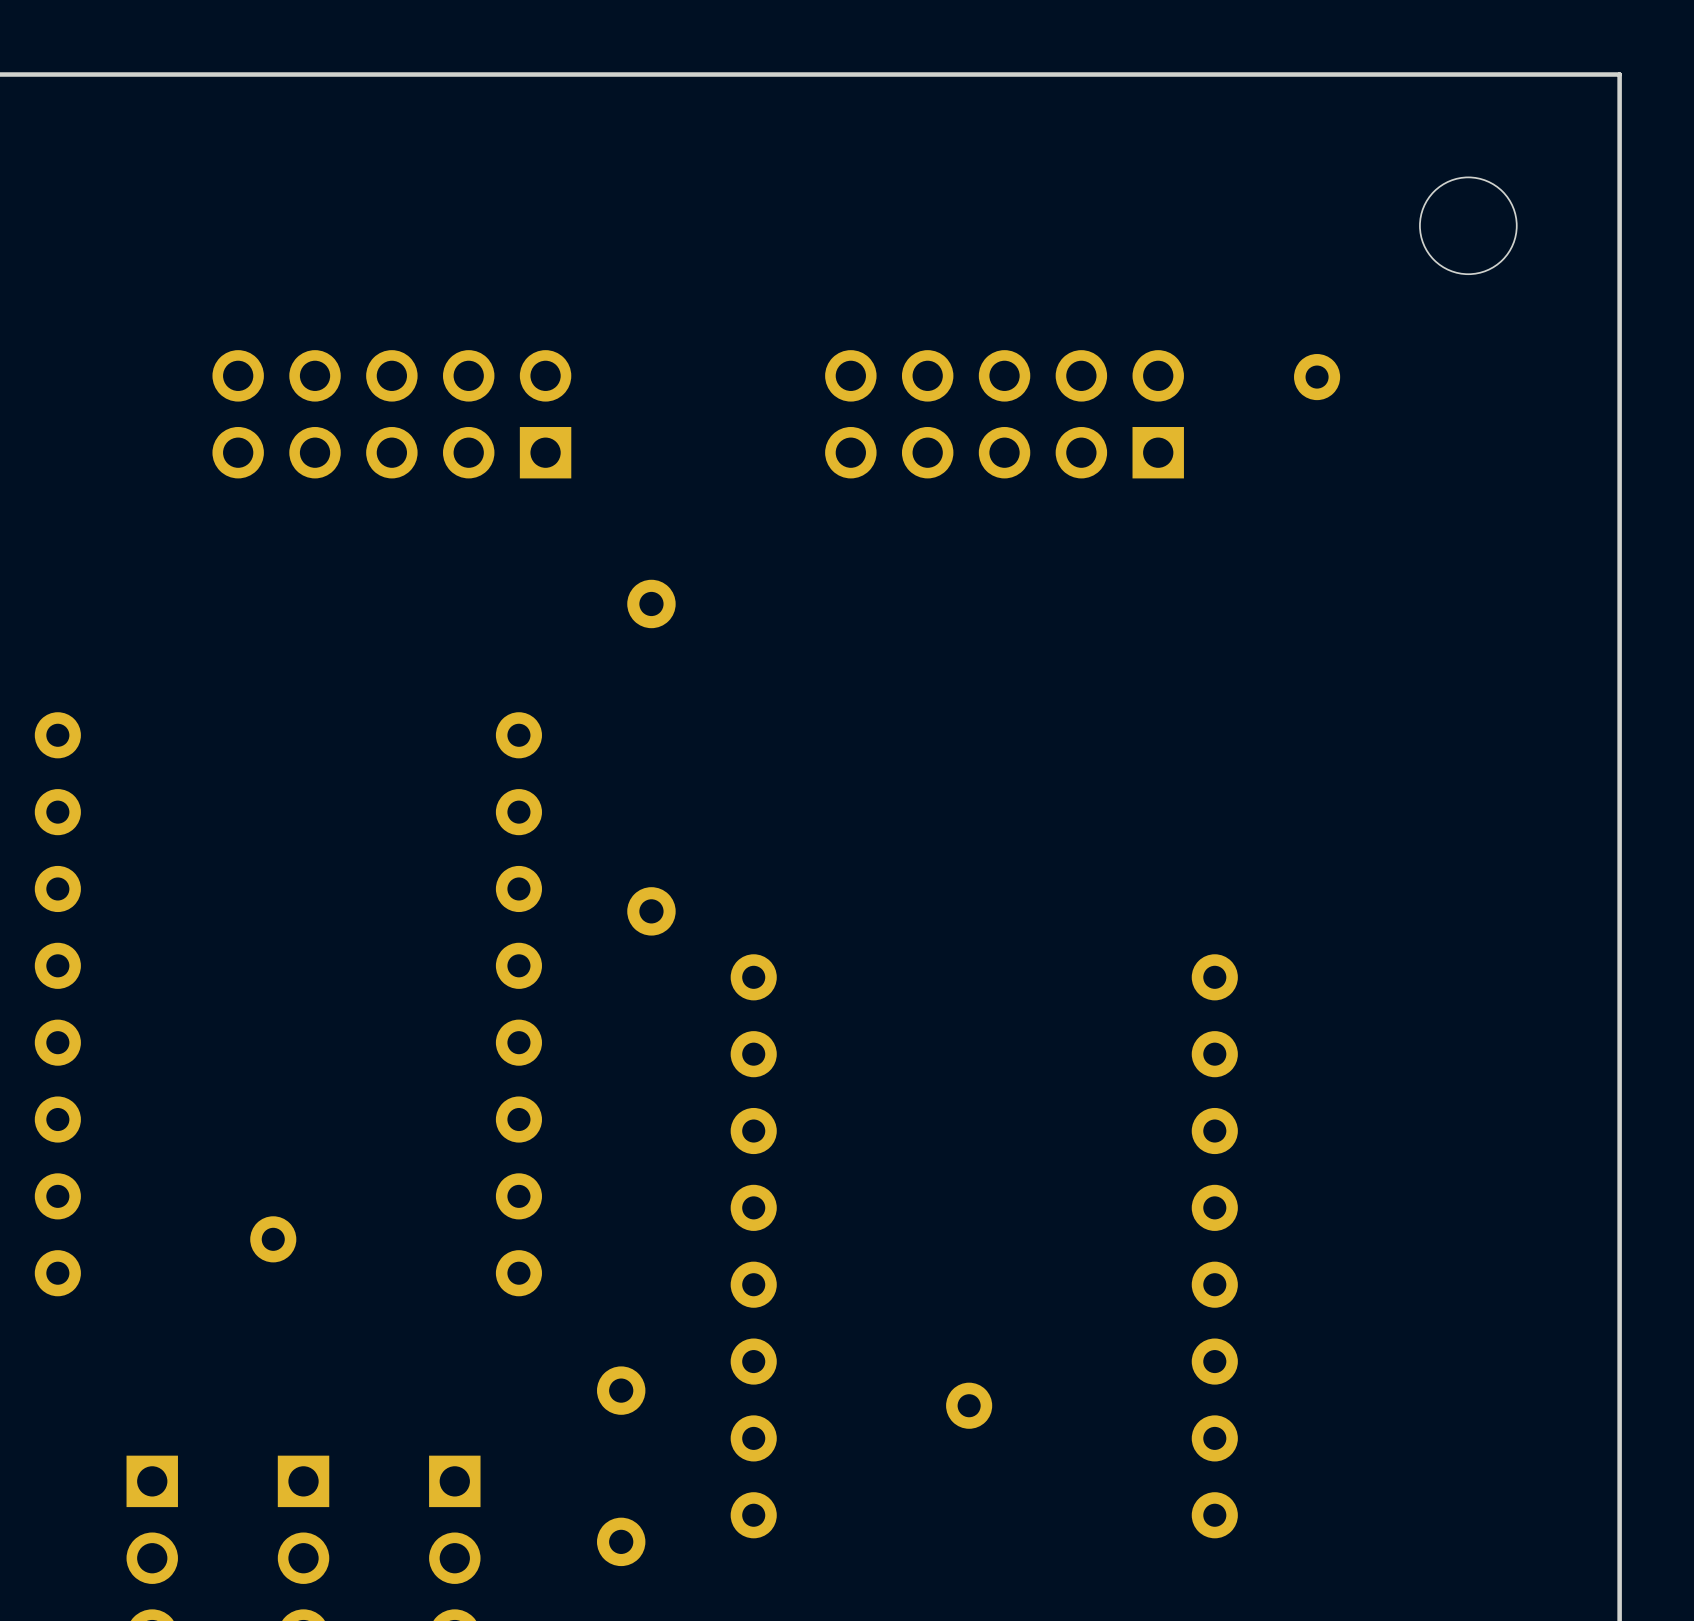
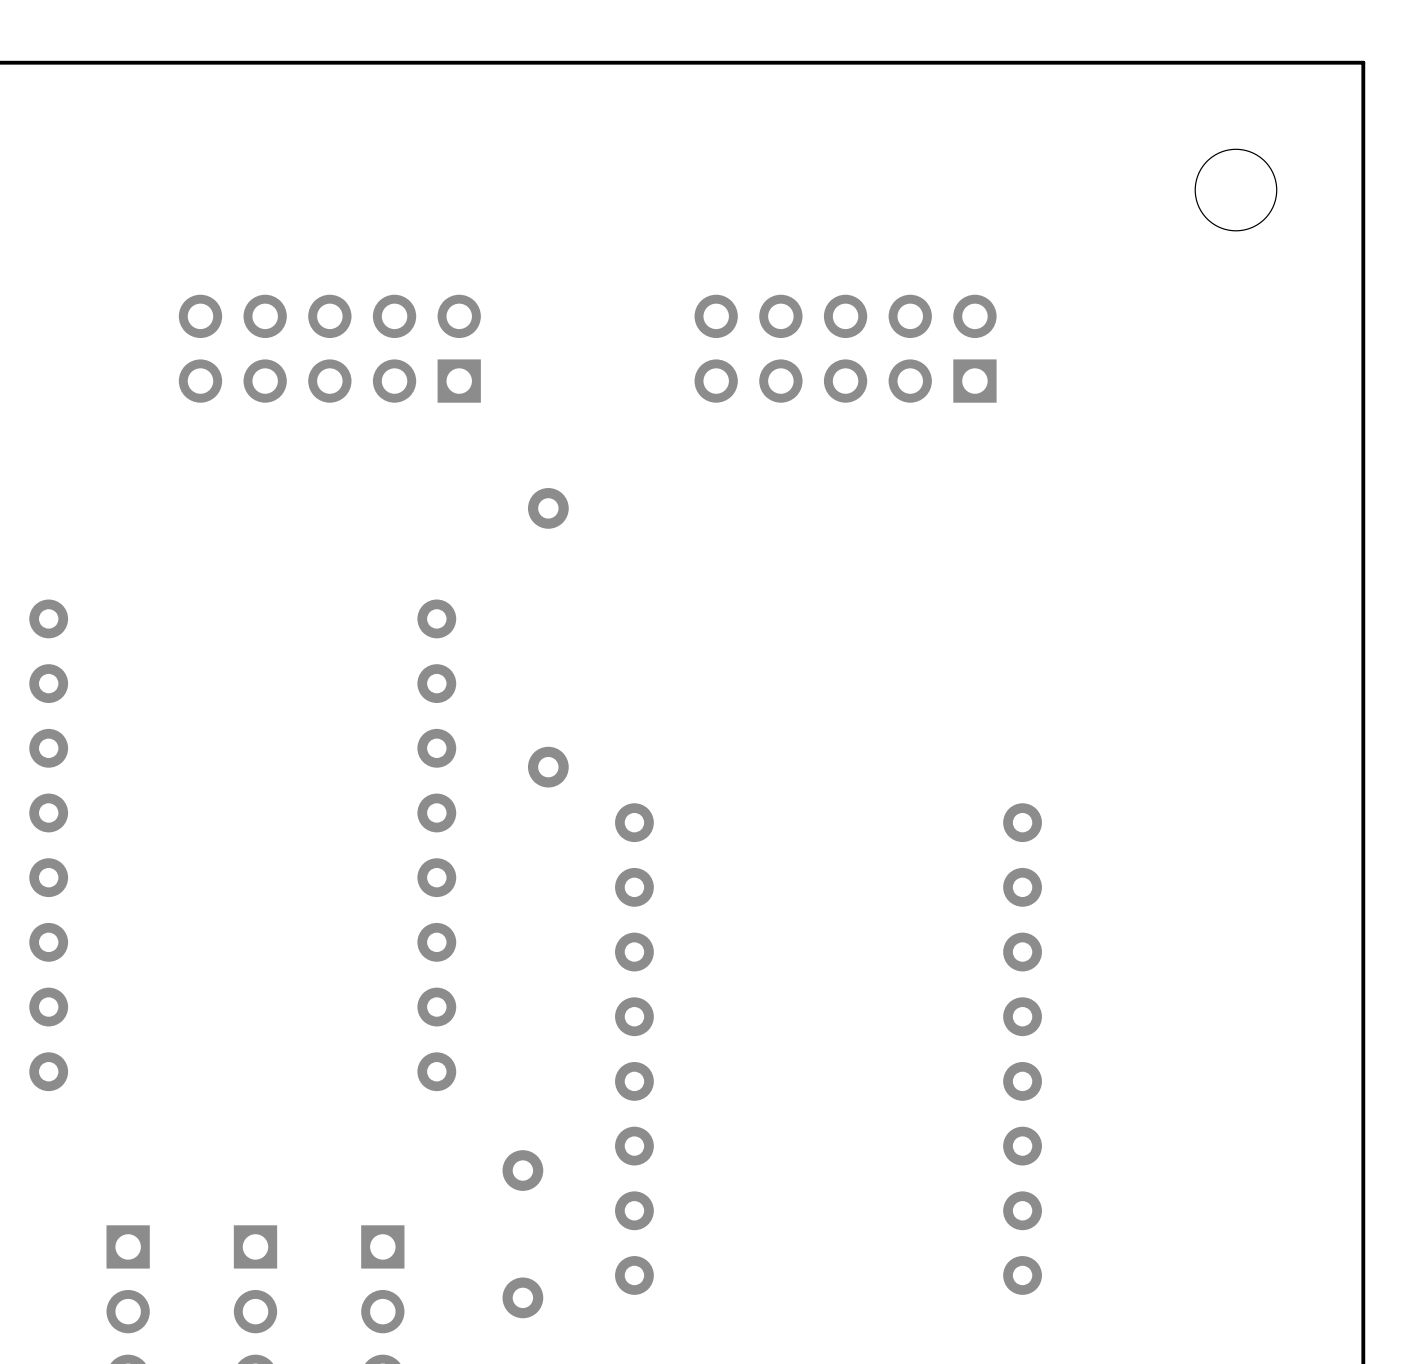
part: (1317, 377) -> none
part: (273, 1239) -> none
part: (969, 1405) -> none

